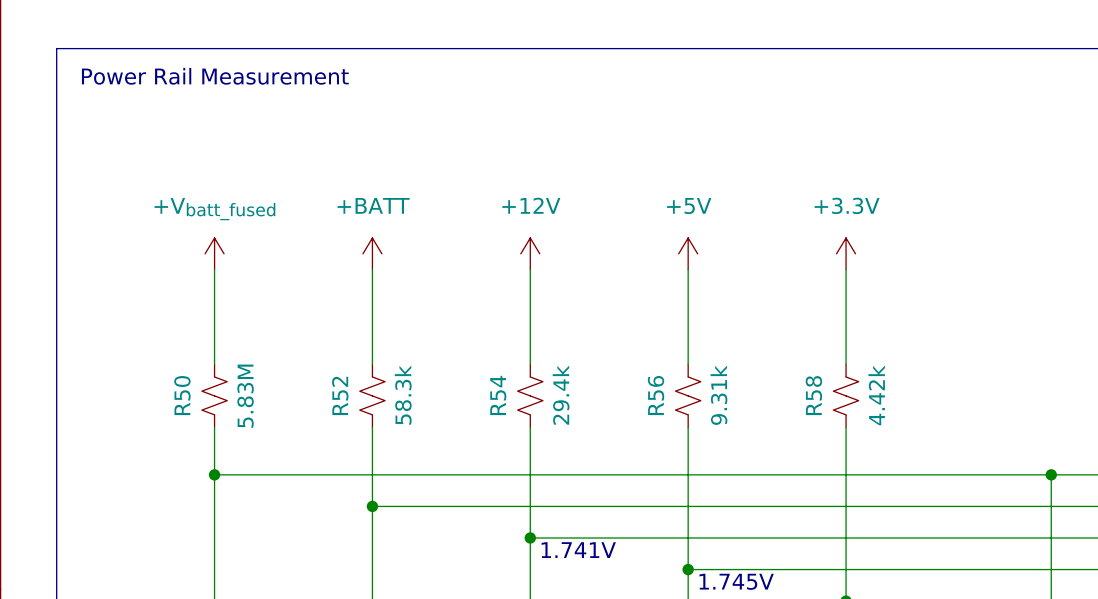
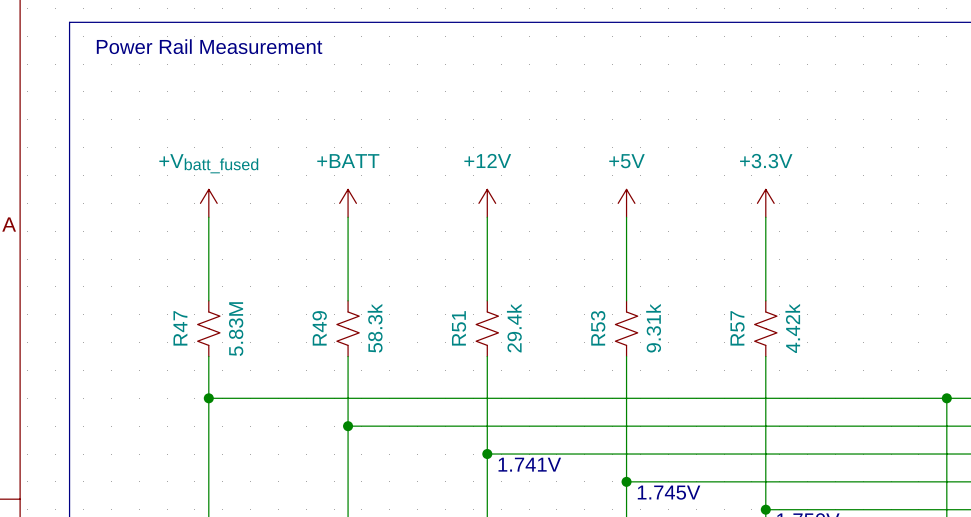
R50 name: R50 (182, 395) -> R47 (180, 328)
R52 name: R52 (340, 395) -> R49 (319, 328)
R54 name: R54 (498, 395) -> R51 (459, 328)
R56 name: R56 (656, 395) -> R53 (598, 328)
R58 name: R58 (813, 395) -> R57 (737, 328)

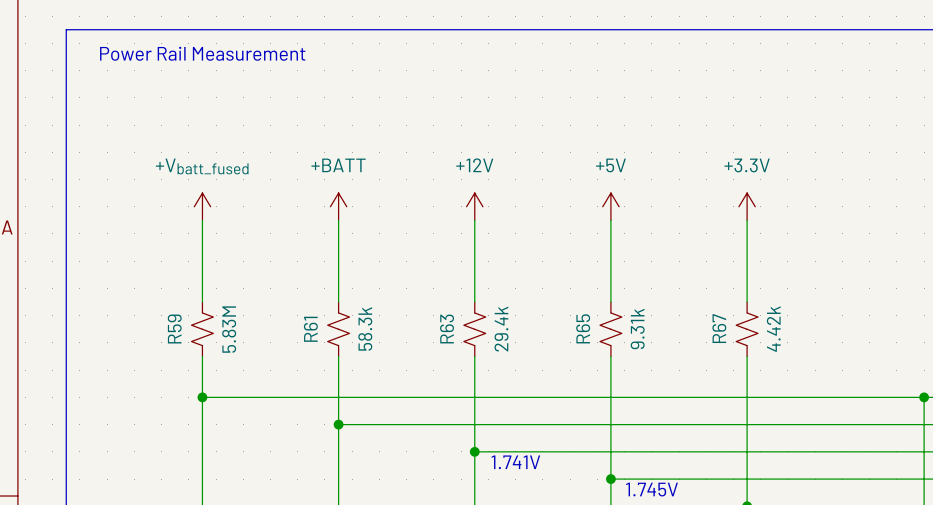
R47 name: R47 (180, 328) -> R59 (174, 329)
R49 name: R49 (319, 328) -> R61 (310, 329)
R51 name: R51 (459, 328) -> R63 (447, 329)
R53 name: R53 (598, 328) -> R65 (583, 328)
R57 name: R57 (737, 328) -> R67 (719, 328)

